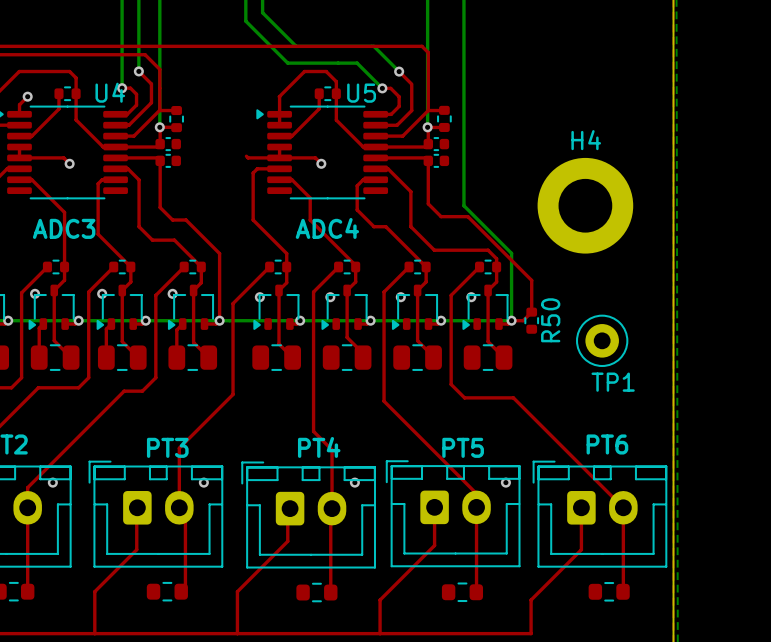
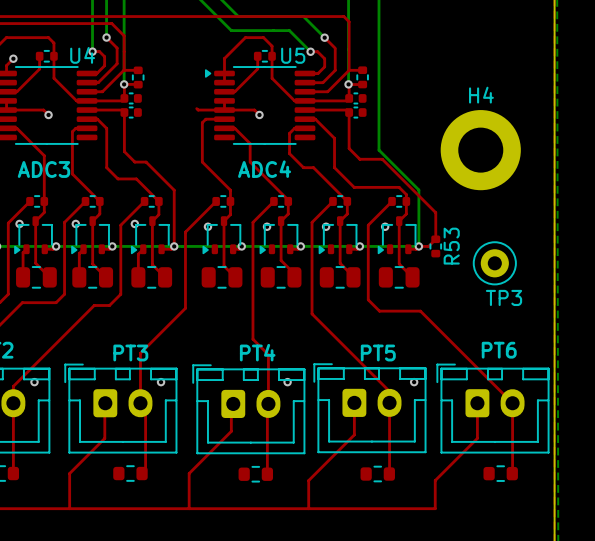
R50 name: R50 (550, 320) -> R53 (451, 246)
TP1 name: TP1 (613, 382) -> TP3 (504, 297)

